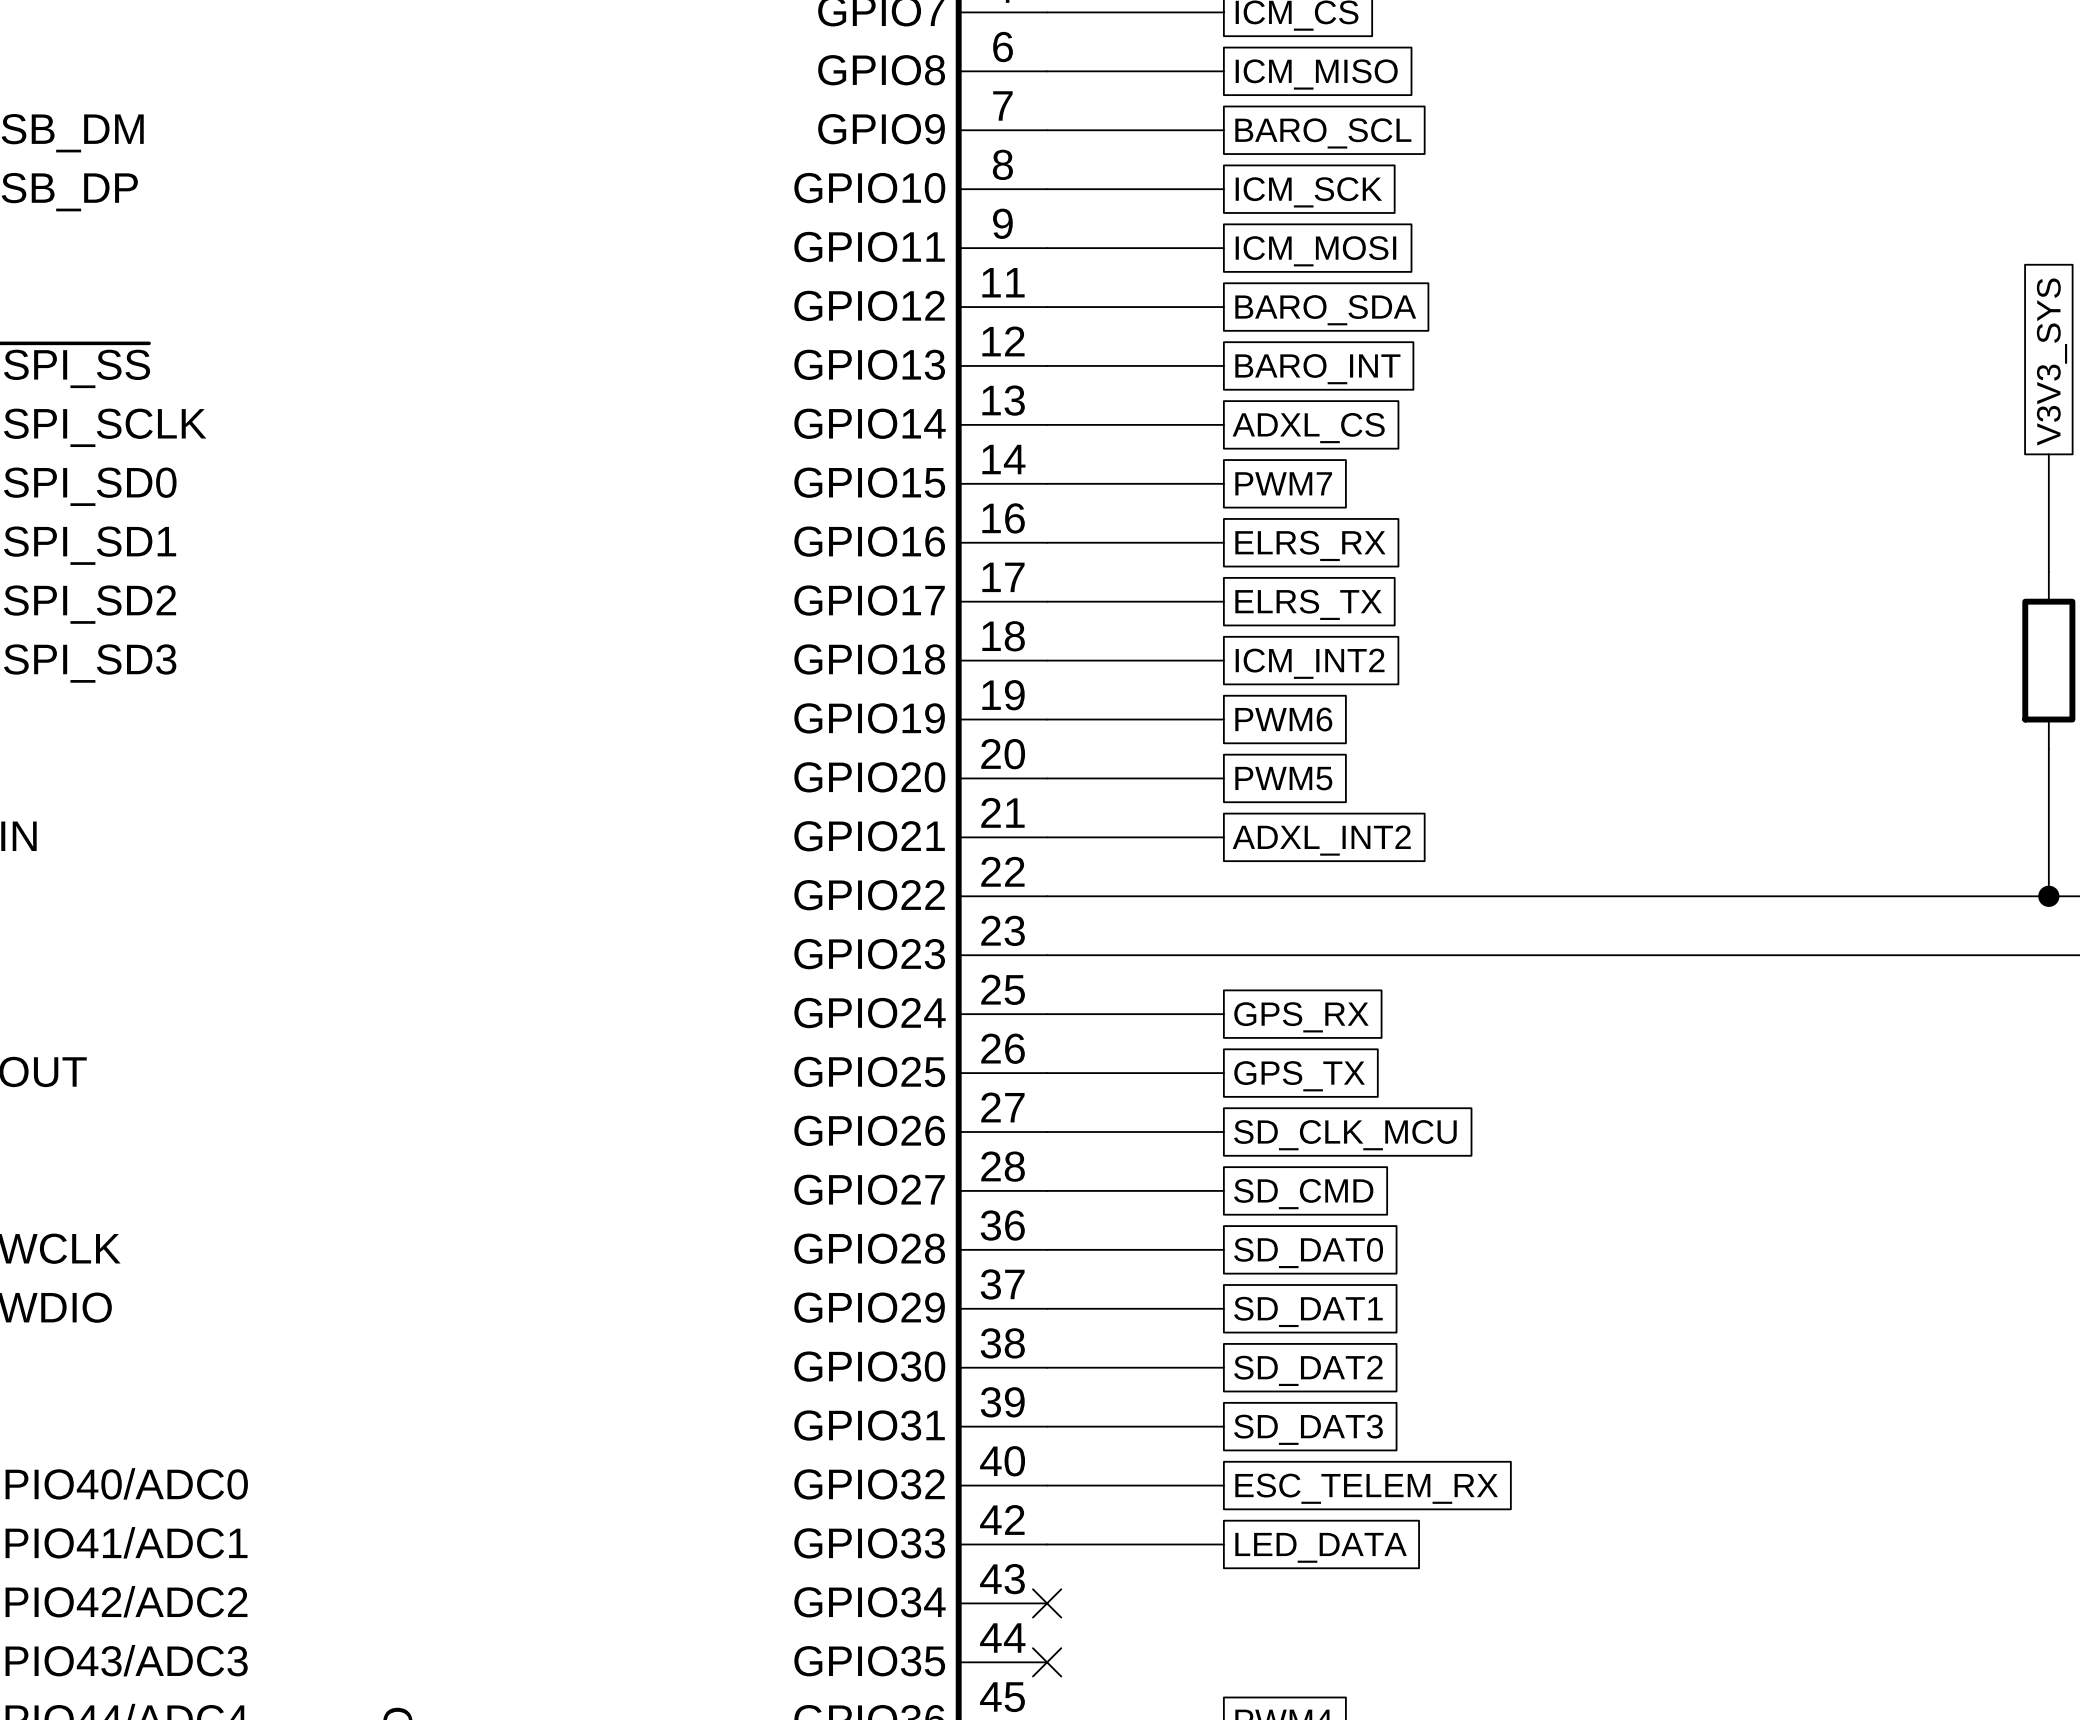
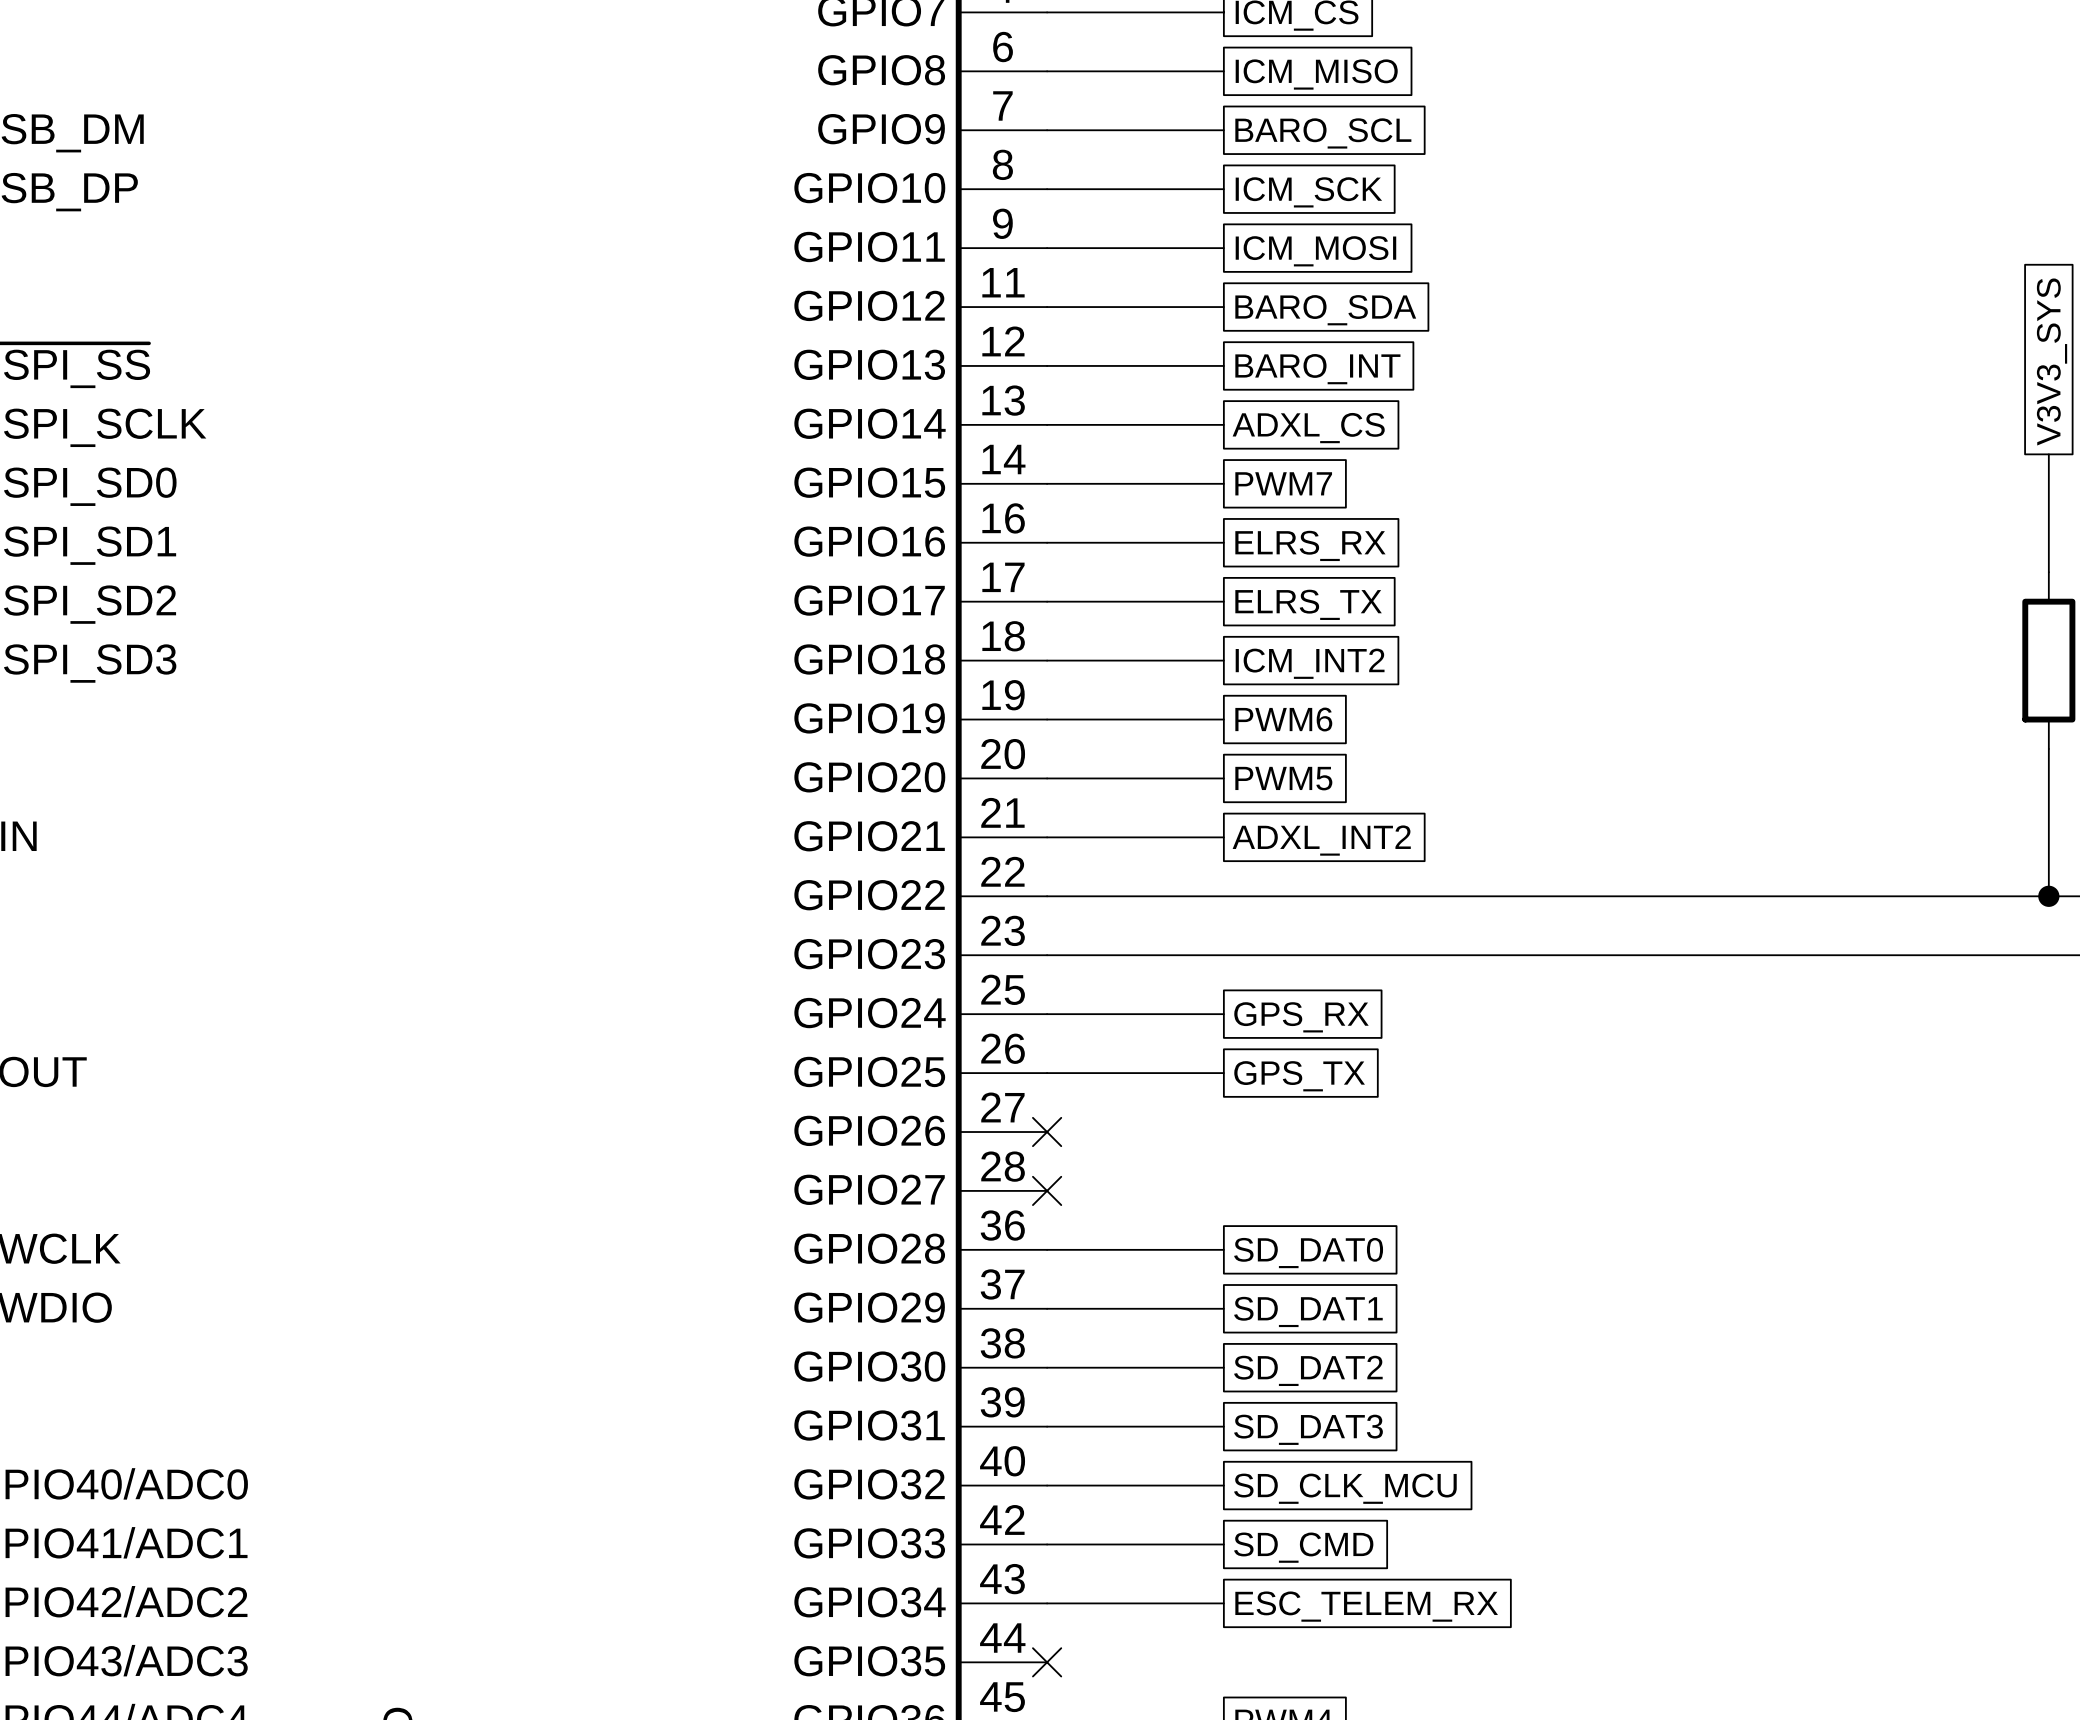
wire: (1047, 1132) (1223, 1132) -> none
no-connect mark: none -> (1047, 1132)
global label: SD_CLK_MCU (1345, 1135) -> none
wire: (1047, 1190) (1223, 1190) -> (1047, 1603) (1223, 1603)
no-connect mark: none -> (1047, 1190)
global label: SD_CMD (1303, 1194) -> none
global label: ESC_TELEM_RX (1366, 1488) -> SD_CLK_MCU (1345, 1488)
global label: LED_DATA (1321, 1547) -> SD_CMD (1303, 1547)
no-connect mark: (1047, 1603) -> none
global label: none -> ESC_TELEM_RX (1366, 1606)

